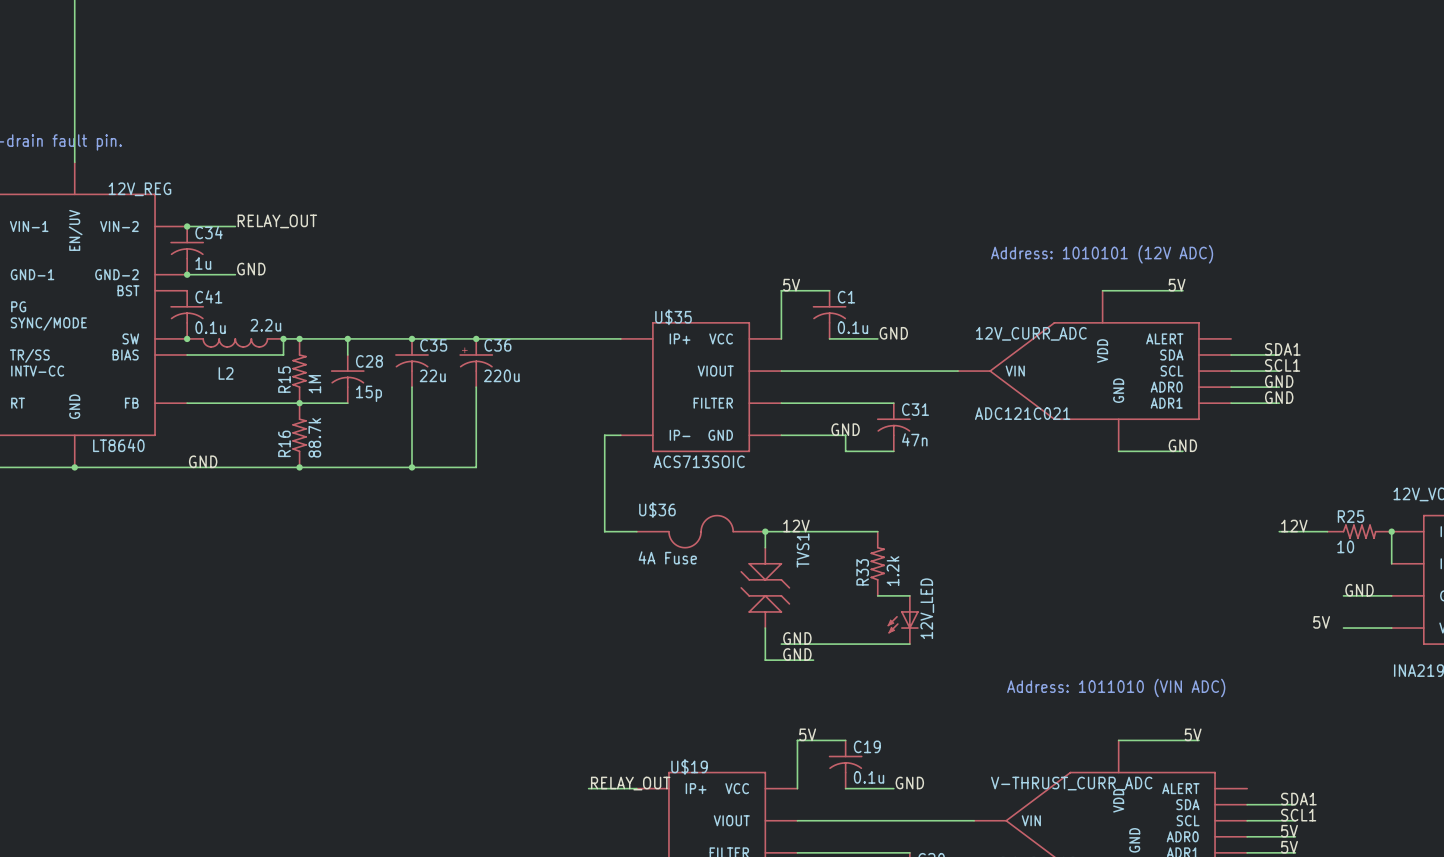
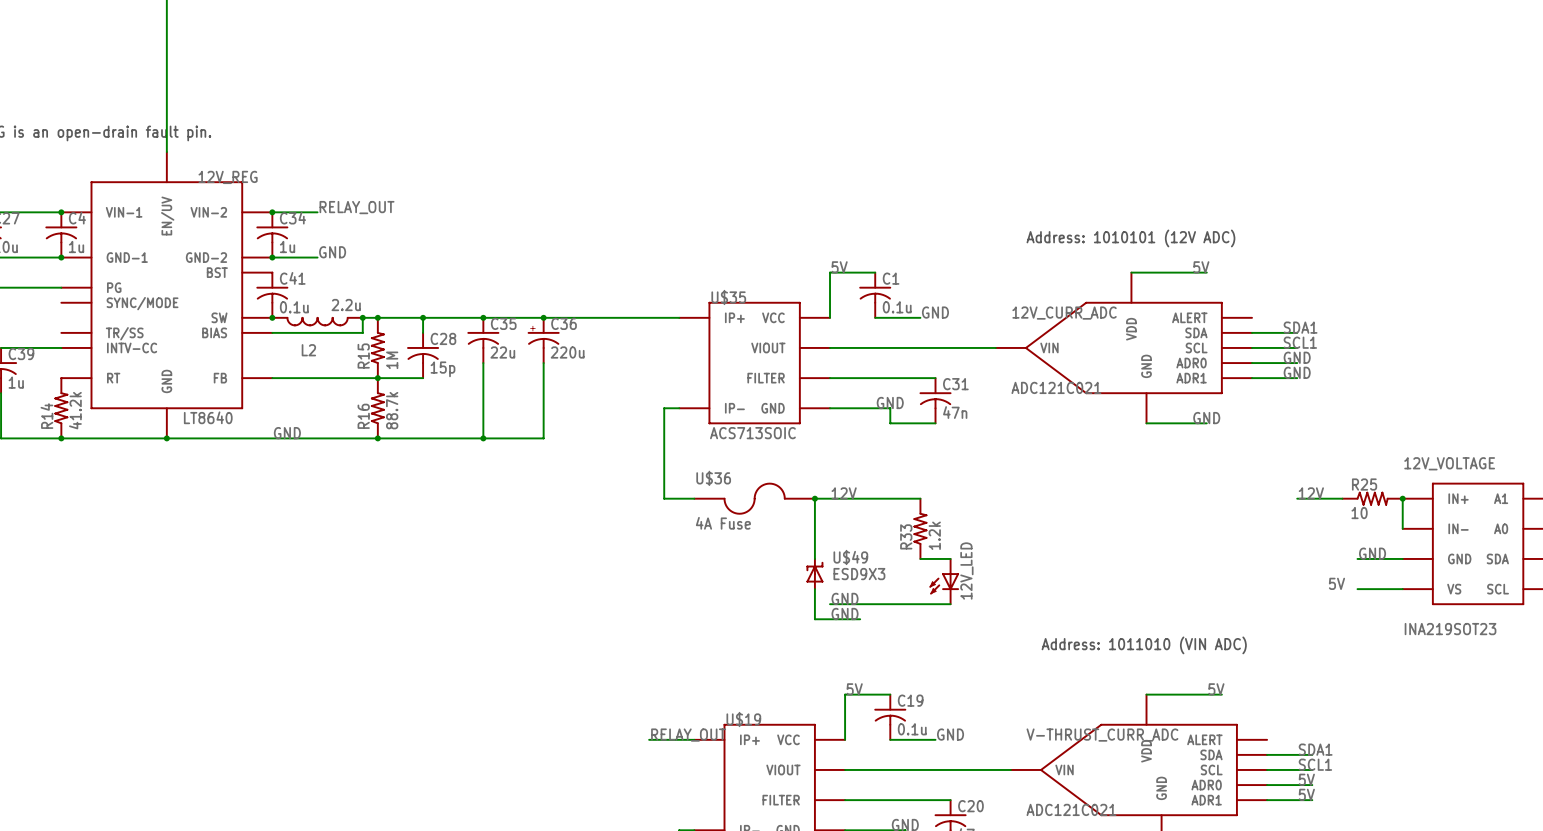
wire: none -> (814, 513) (814, 558)
TVS1: (765, 587) -> none
U$49: none -> ESD9X3 (814, 574)

